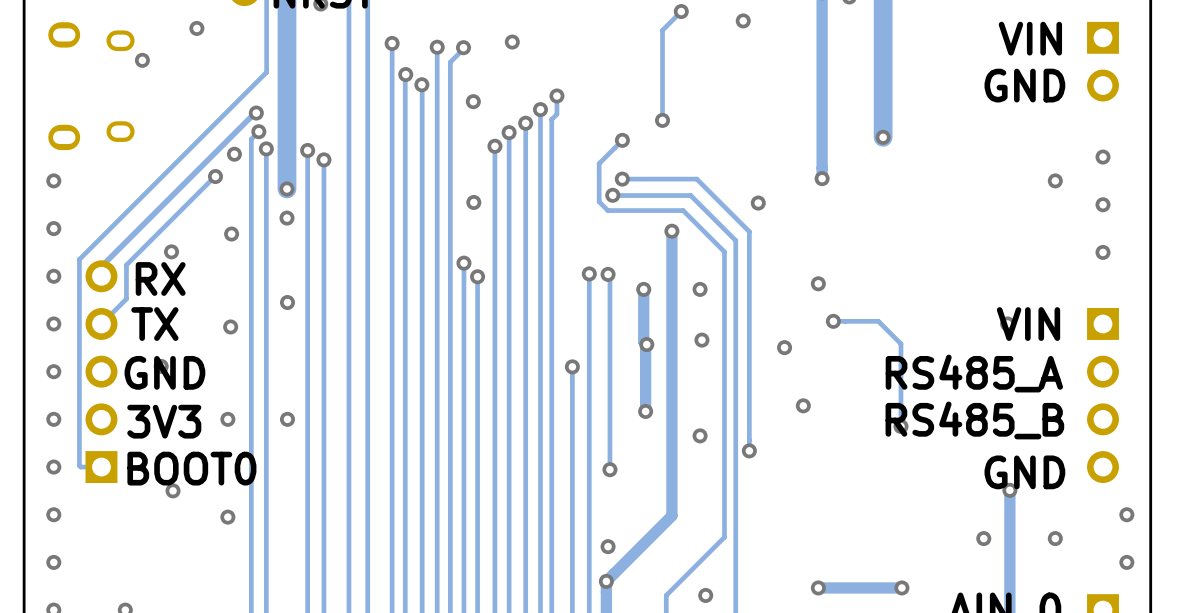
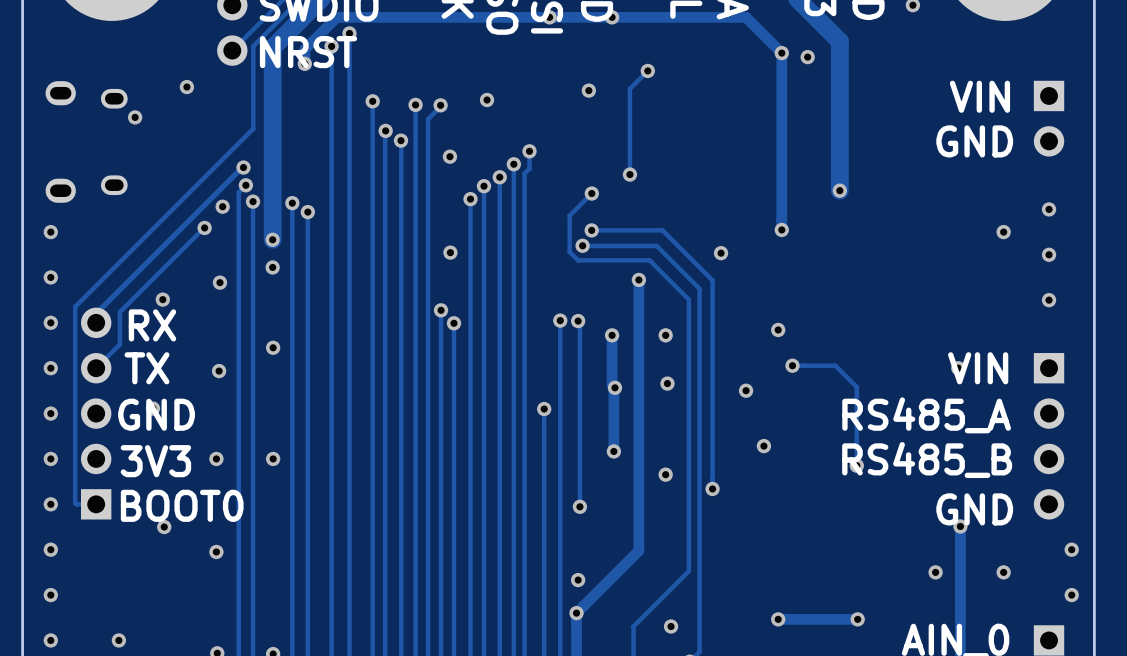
via: (743, 20) -> none
via: none -> (588, 90)

